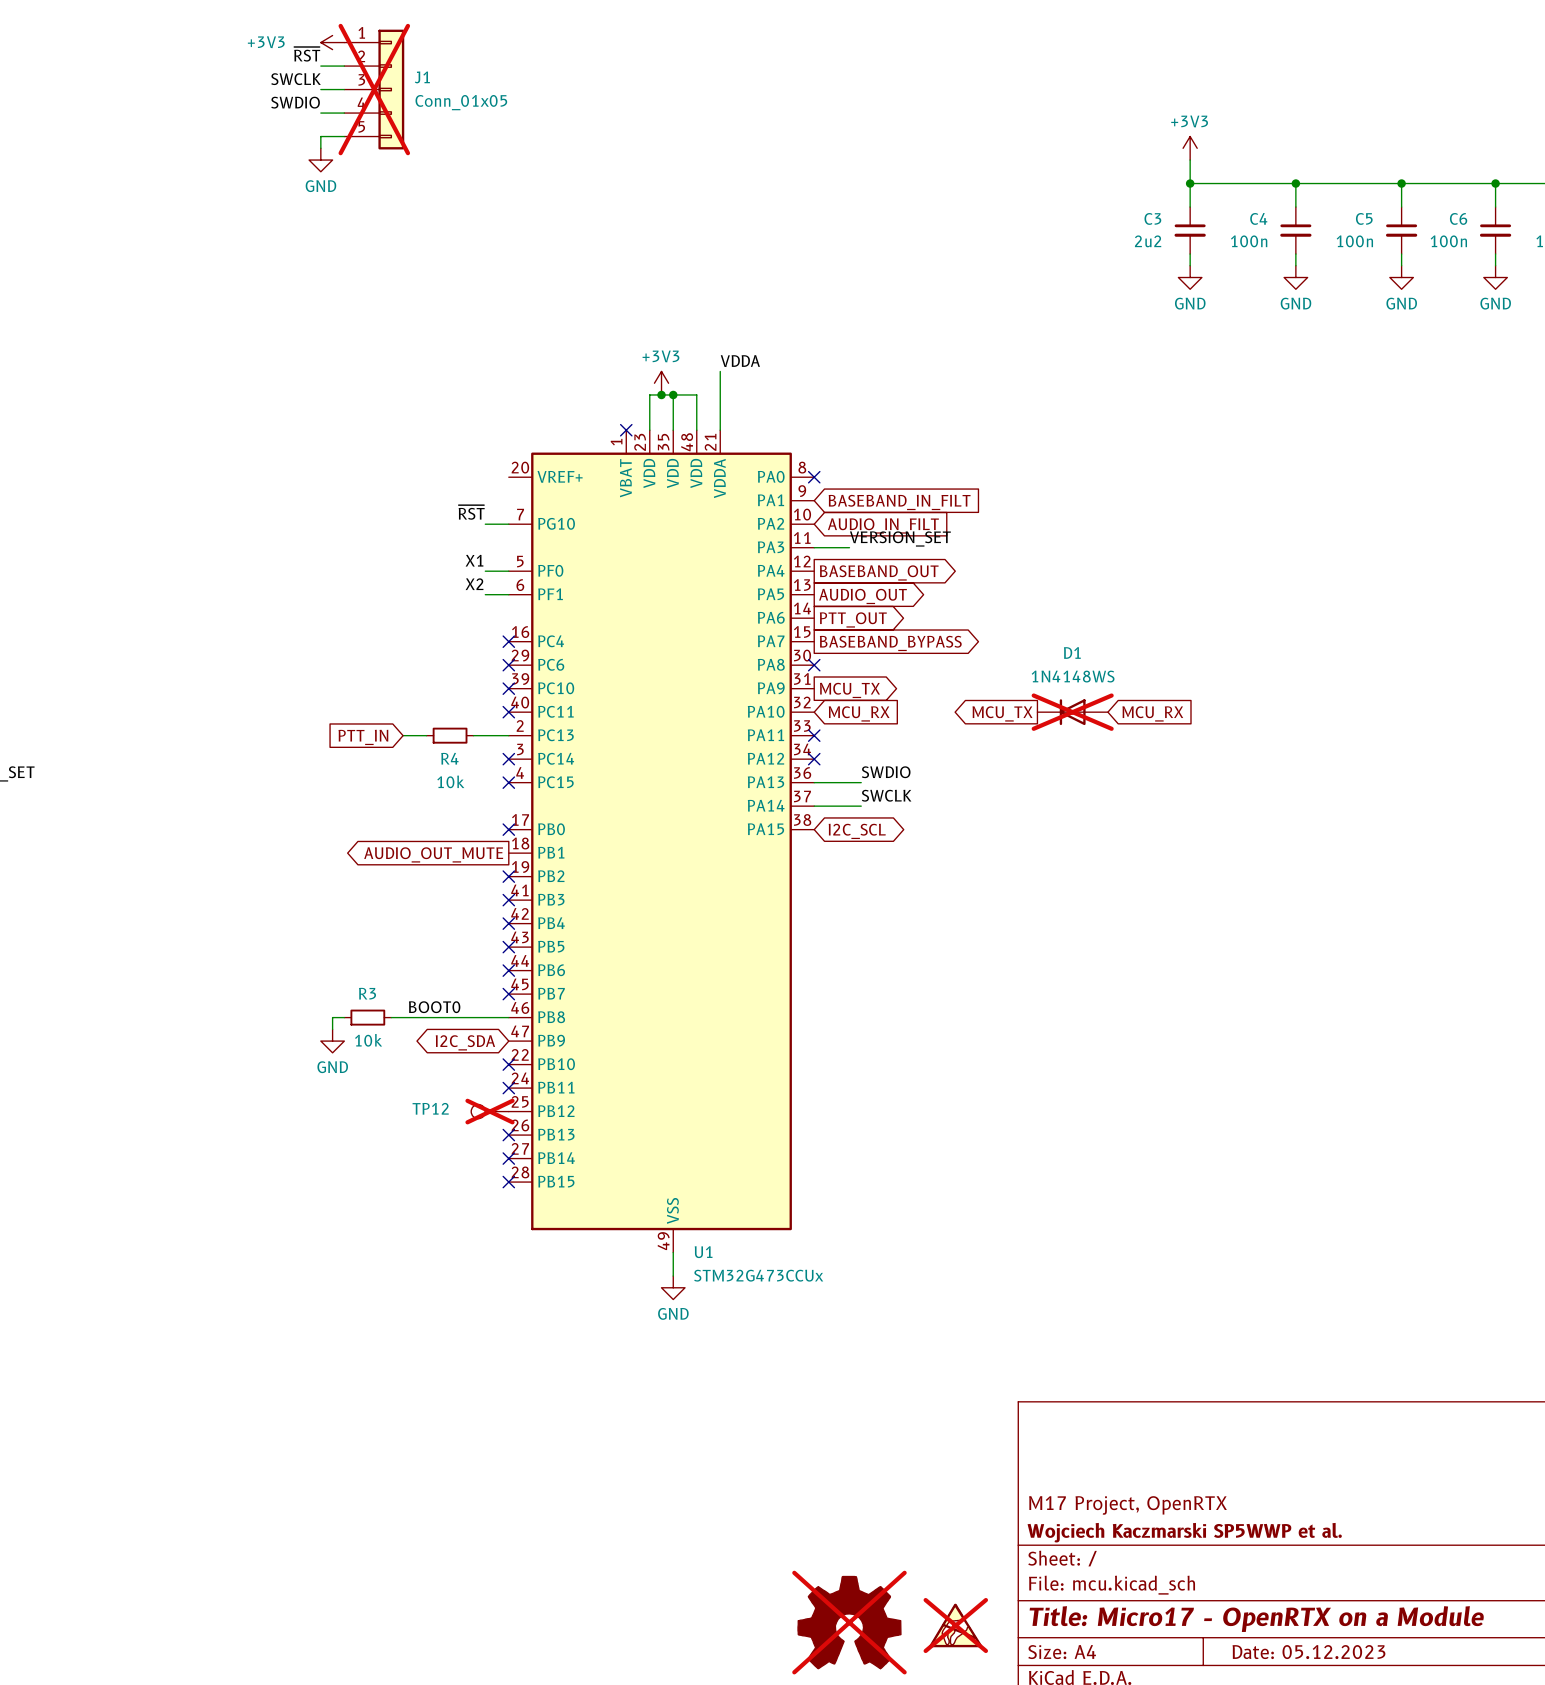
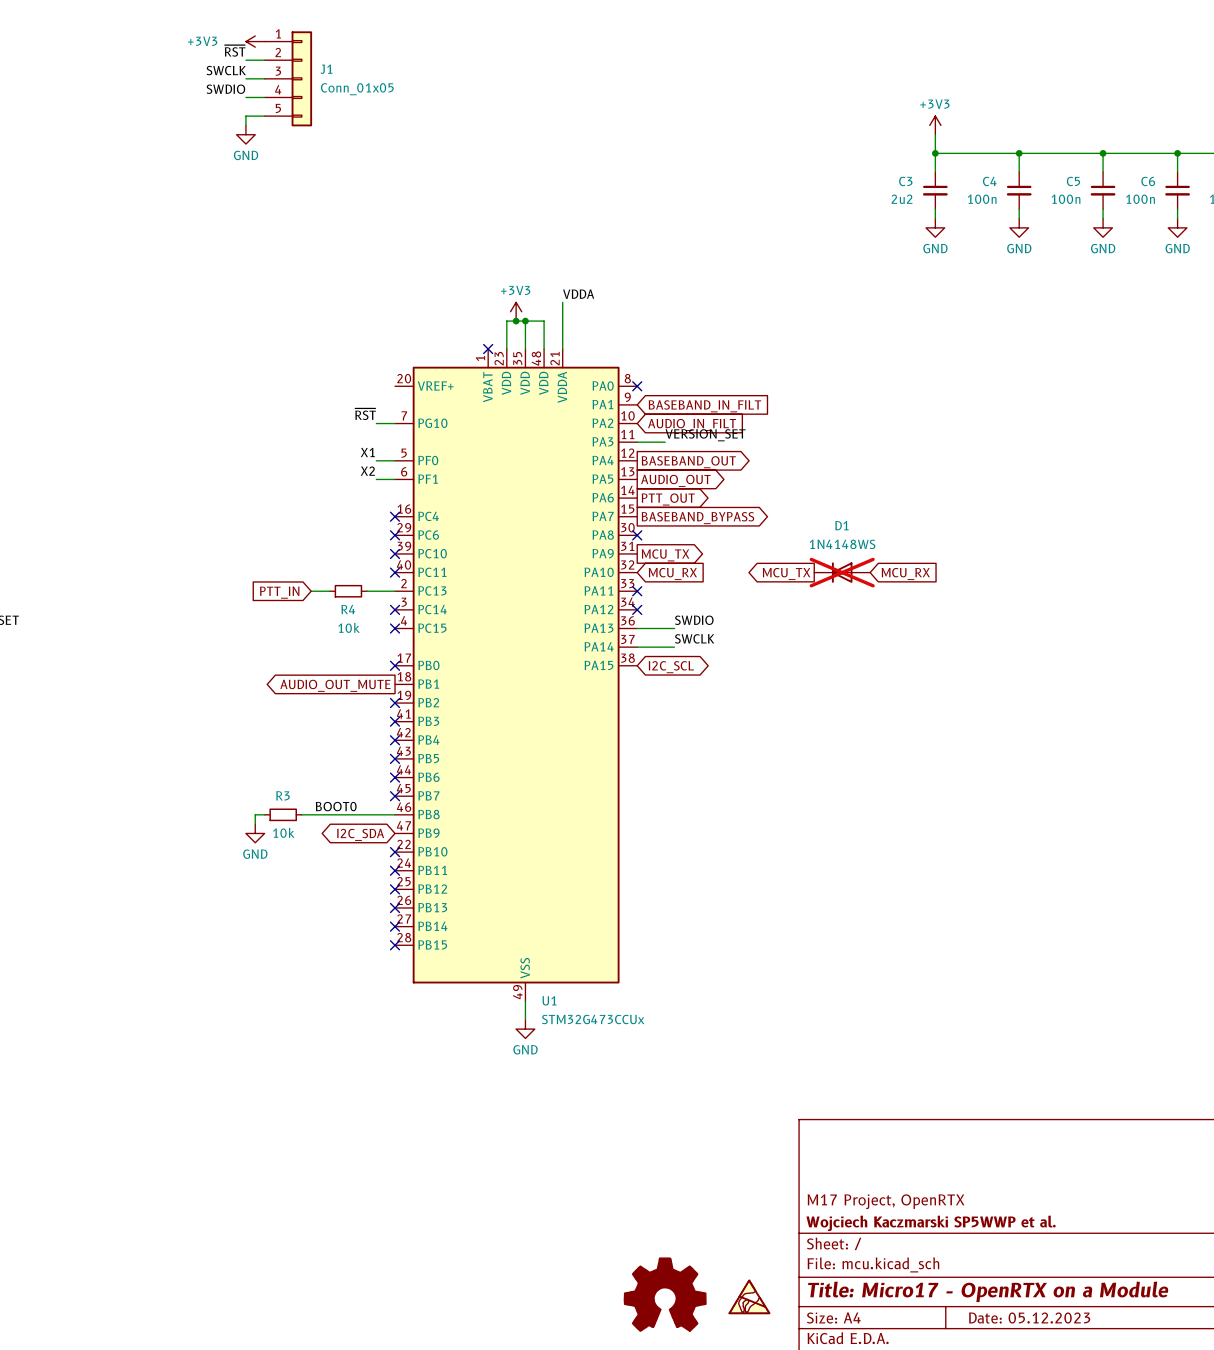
J1 do-not-place cross: (374, 89) -> none
TP12: (490, 1111) -> none
no-connect mark: none -> (395, 889)
part do-not-place cross: (849, 1622) -> none
part do-not-place cross: (955, 1625) -> none

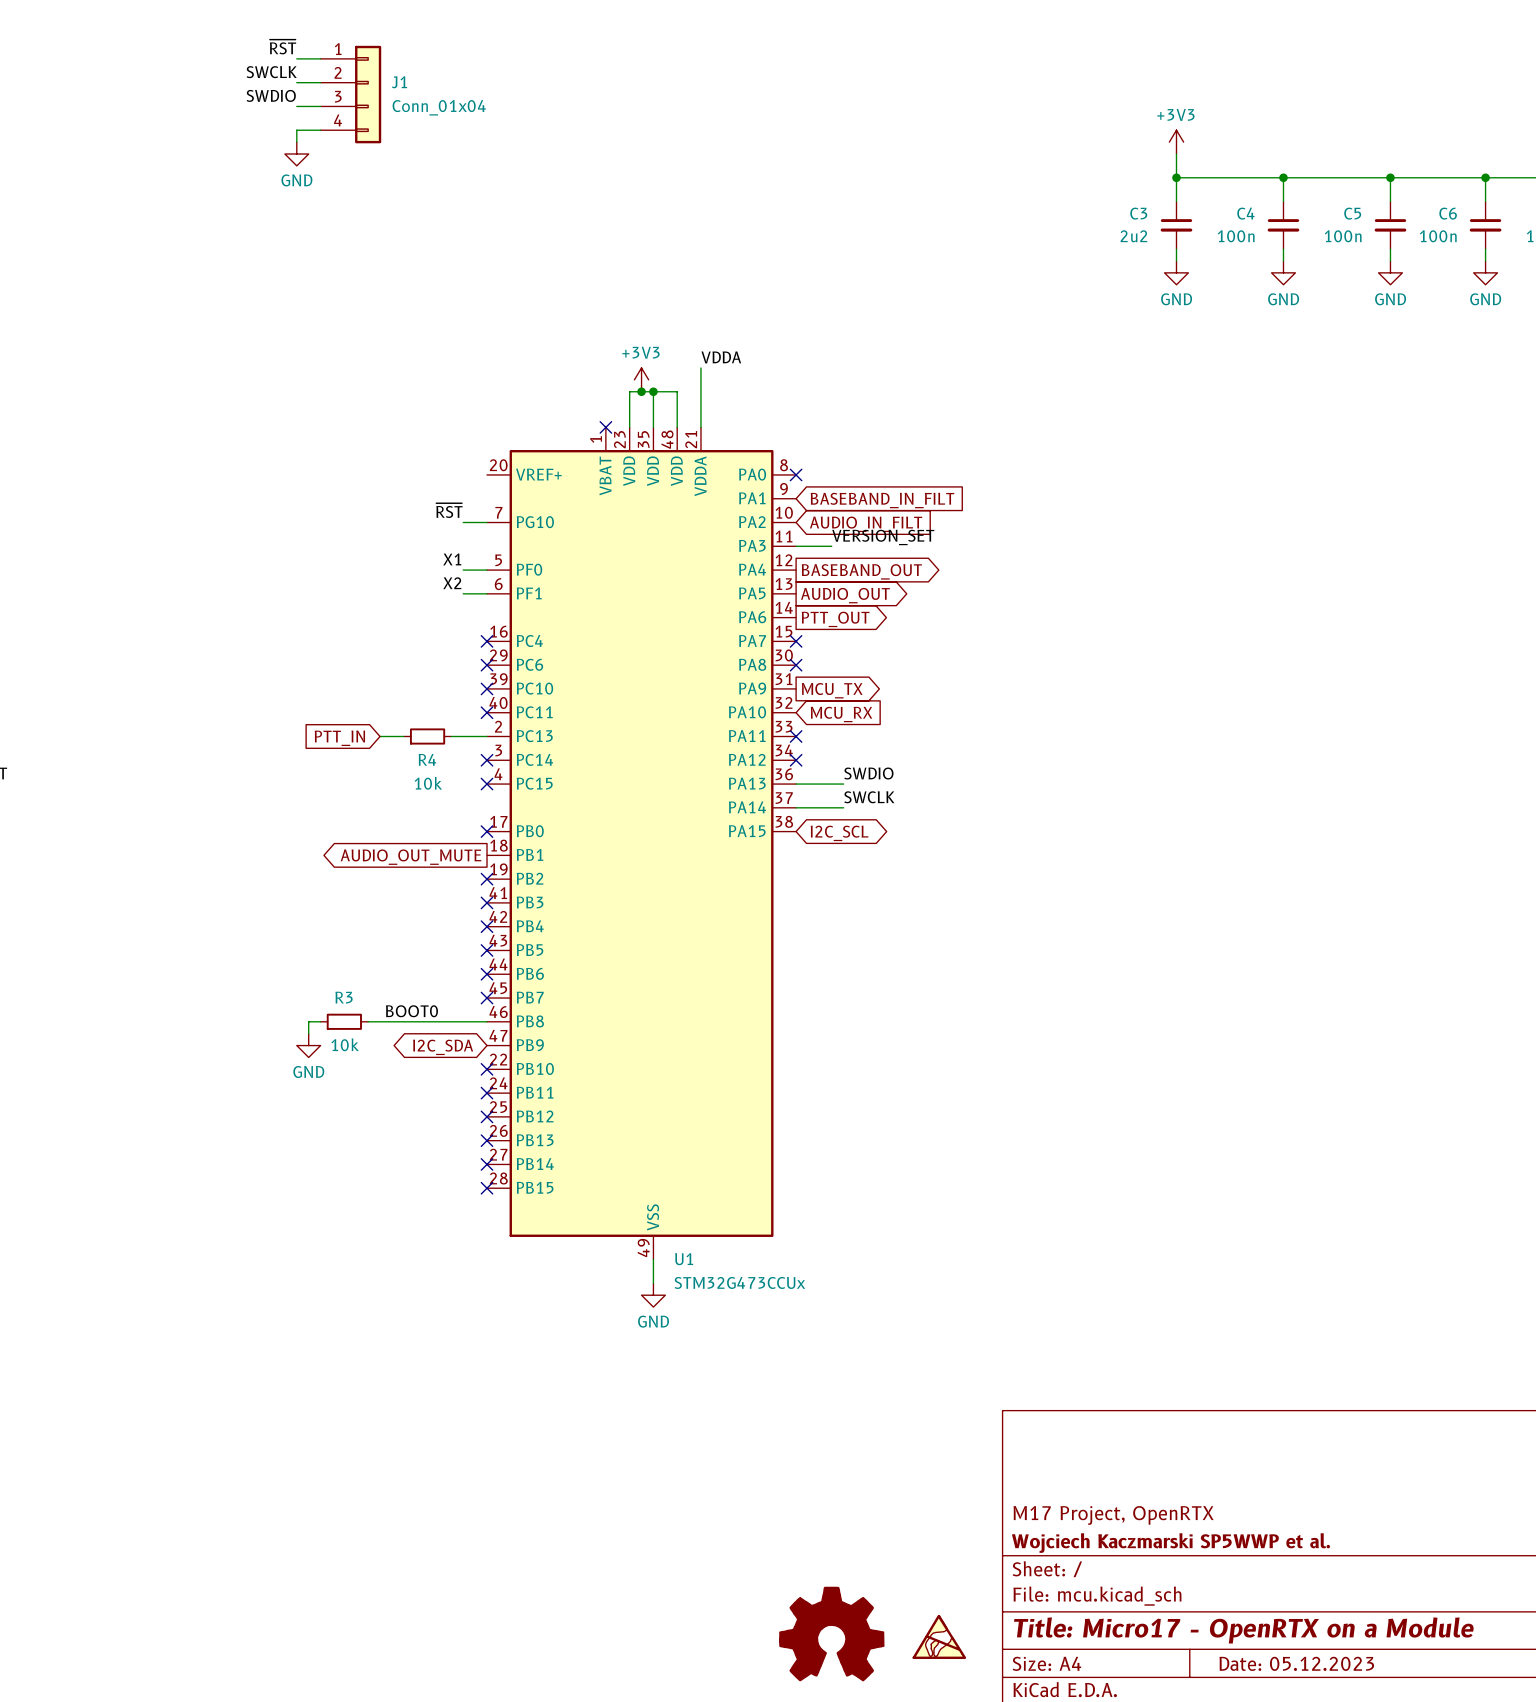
J1 symbol: [264, 31, 313, 127] -> [320, 45, 382, 144]
power symbol: +3V3 (255, 41) -> none
J1 value: Conn_01x05 (357, 89) -> Conn_01x04 (439, 107)
no-connect mark: none -> (796, 641)
global label: BASEBAND_BYPASS (697, 518) -> none
D1: 1N4148WS (842, 572) -> none
global label: MCU_TX (786, 574) -> none
global label: MCU_RX (905, 574) -> none

